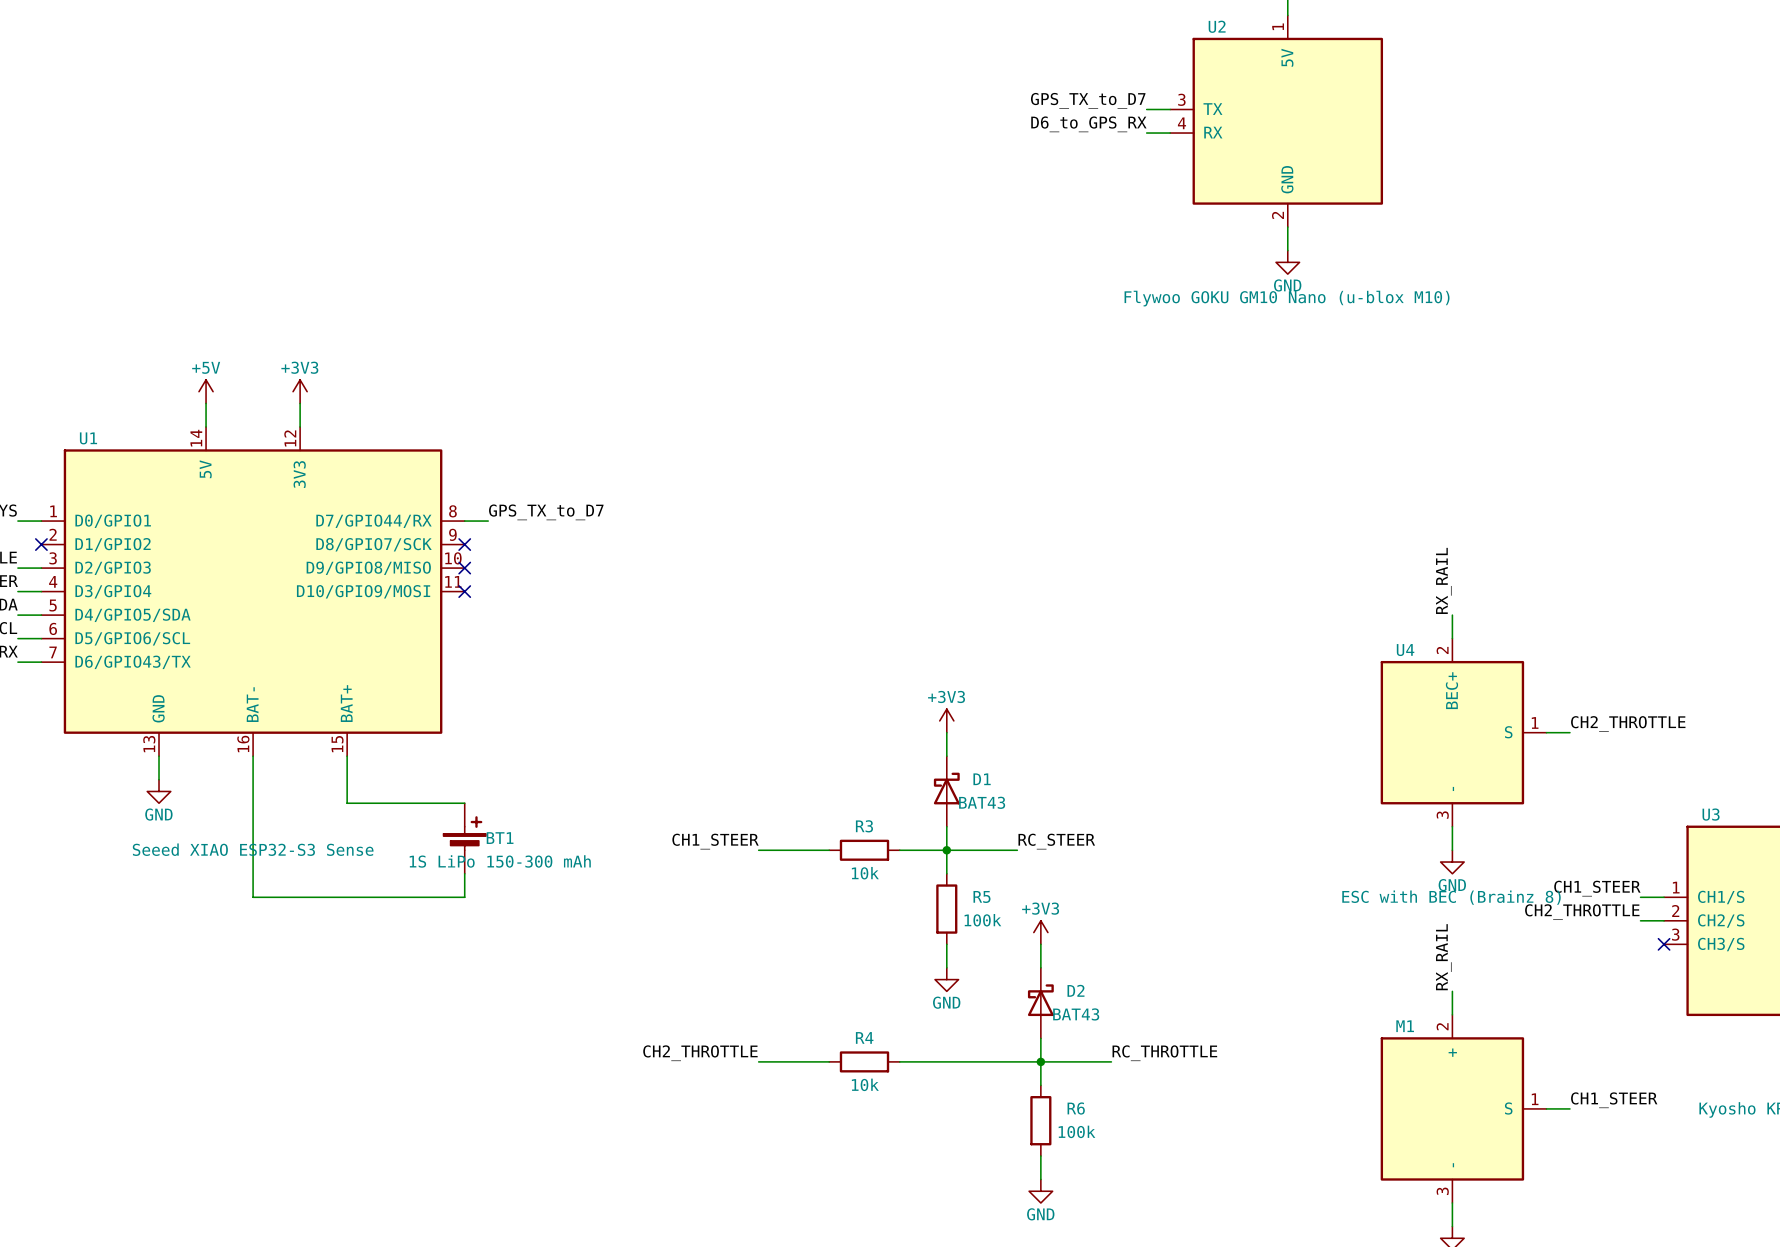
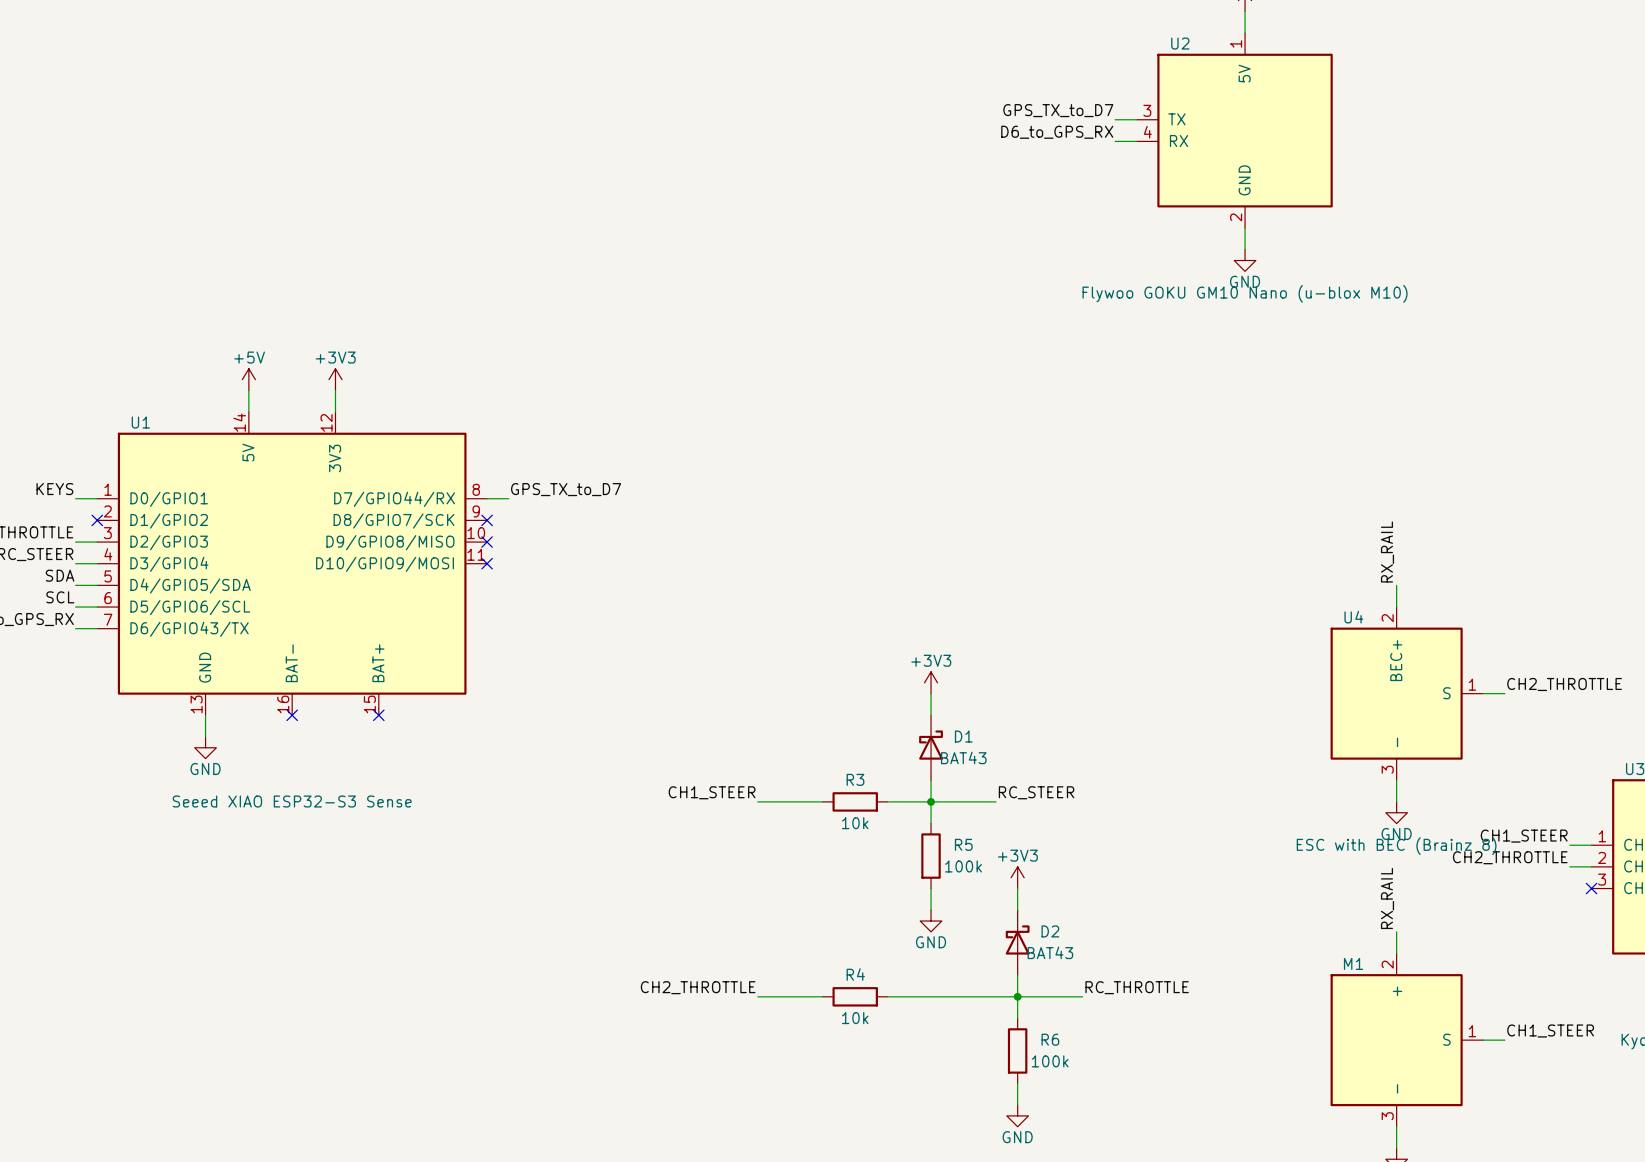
wire: (253, 756) (253, 897) (464, 897) (464, 873) -> none
no-connect mark: none -> (292, 715)
wire: (347, 756) (347, 803) (464, 803) -> none
no-connect mark: none -> (378, 715)
BT1: 1S LiPo 150-300 mAh (464, 838) -> none

